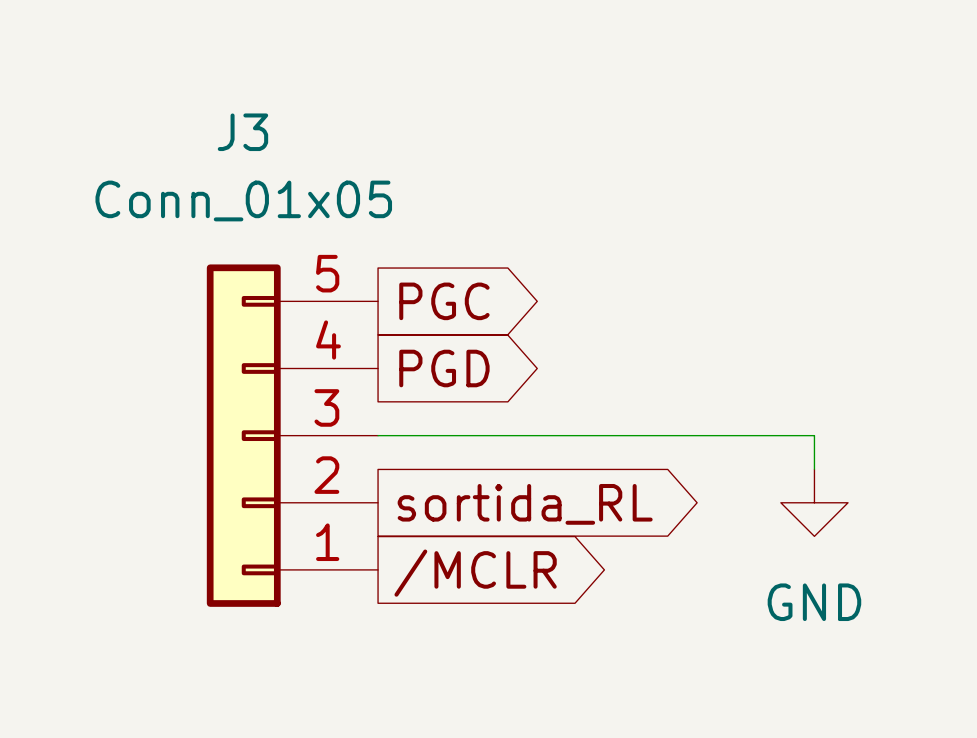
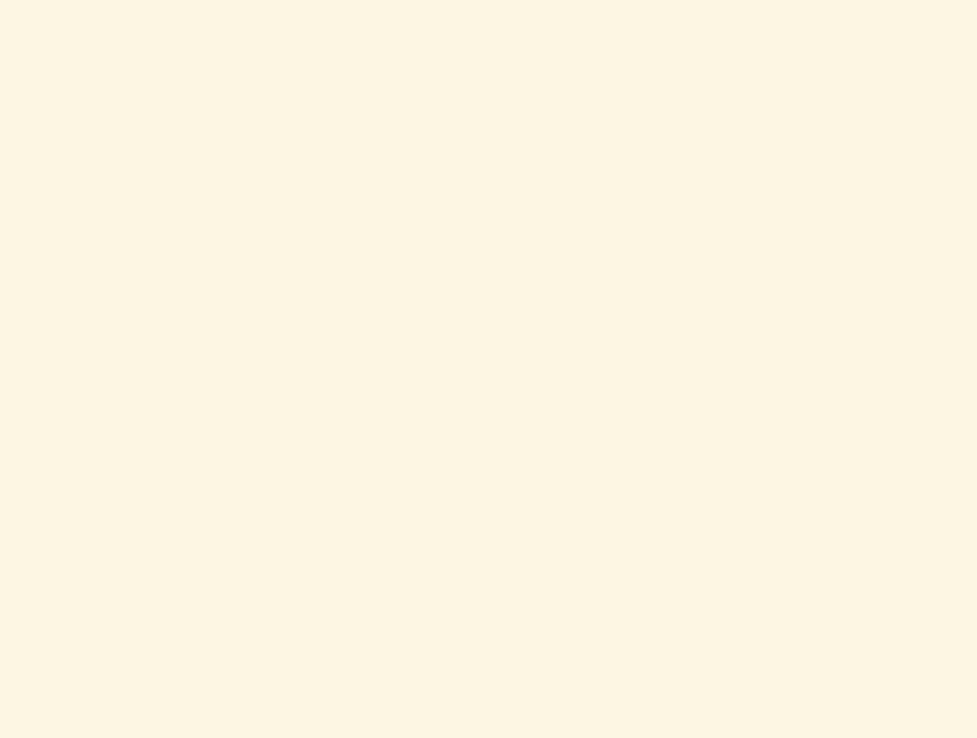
global label: PGC (444, 301) -> none
global label: PGD (444, 368) -> none
J3: Conn_01x05 (292, 435) -> none
wire: (378, 435) (814, 435) (814, 469) -> none
power symbol: GND (814, 502) -> none
global label: sortida_RL (525, 504) -> none
global label: /MCLR (475, 573) -> none

